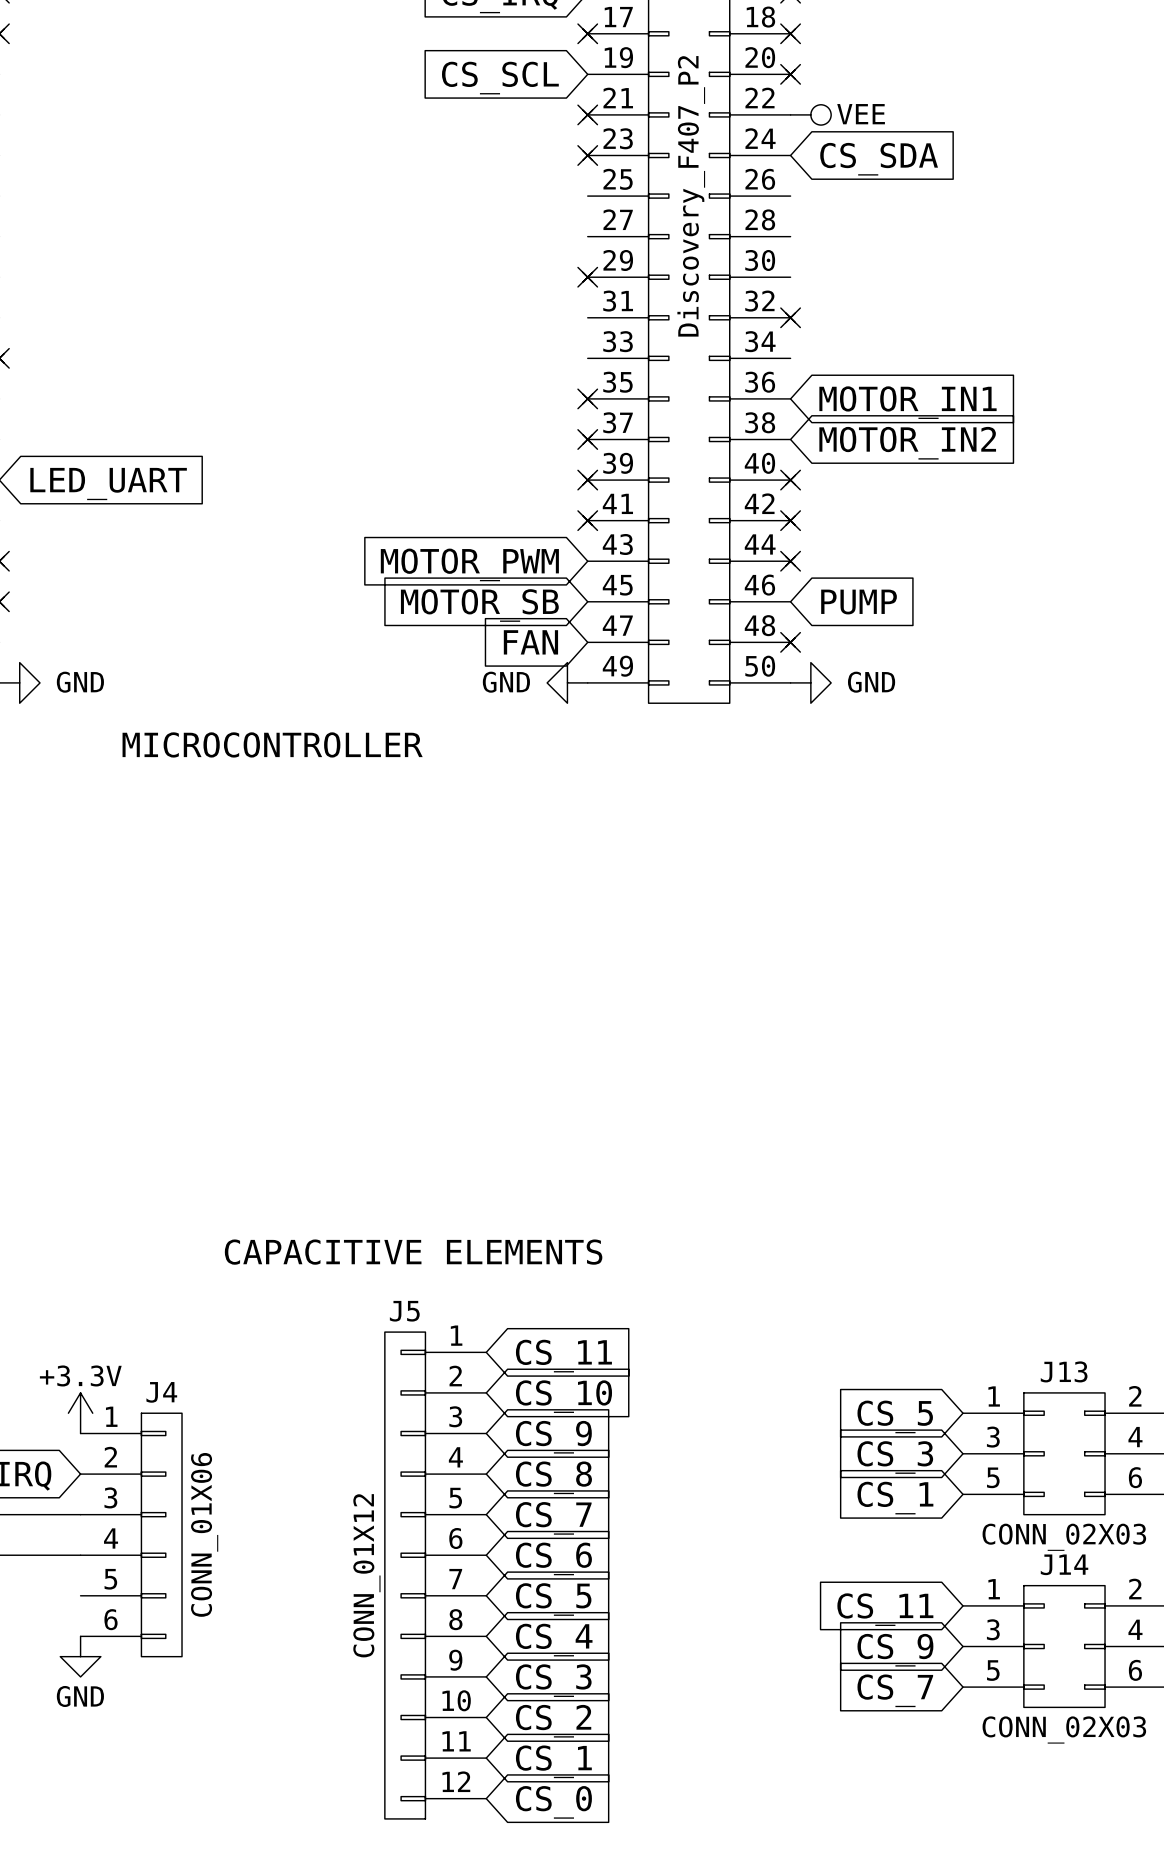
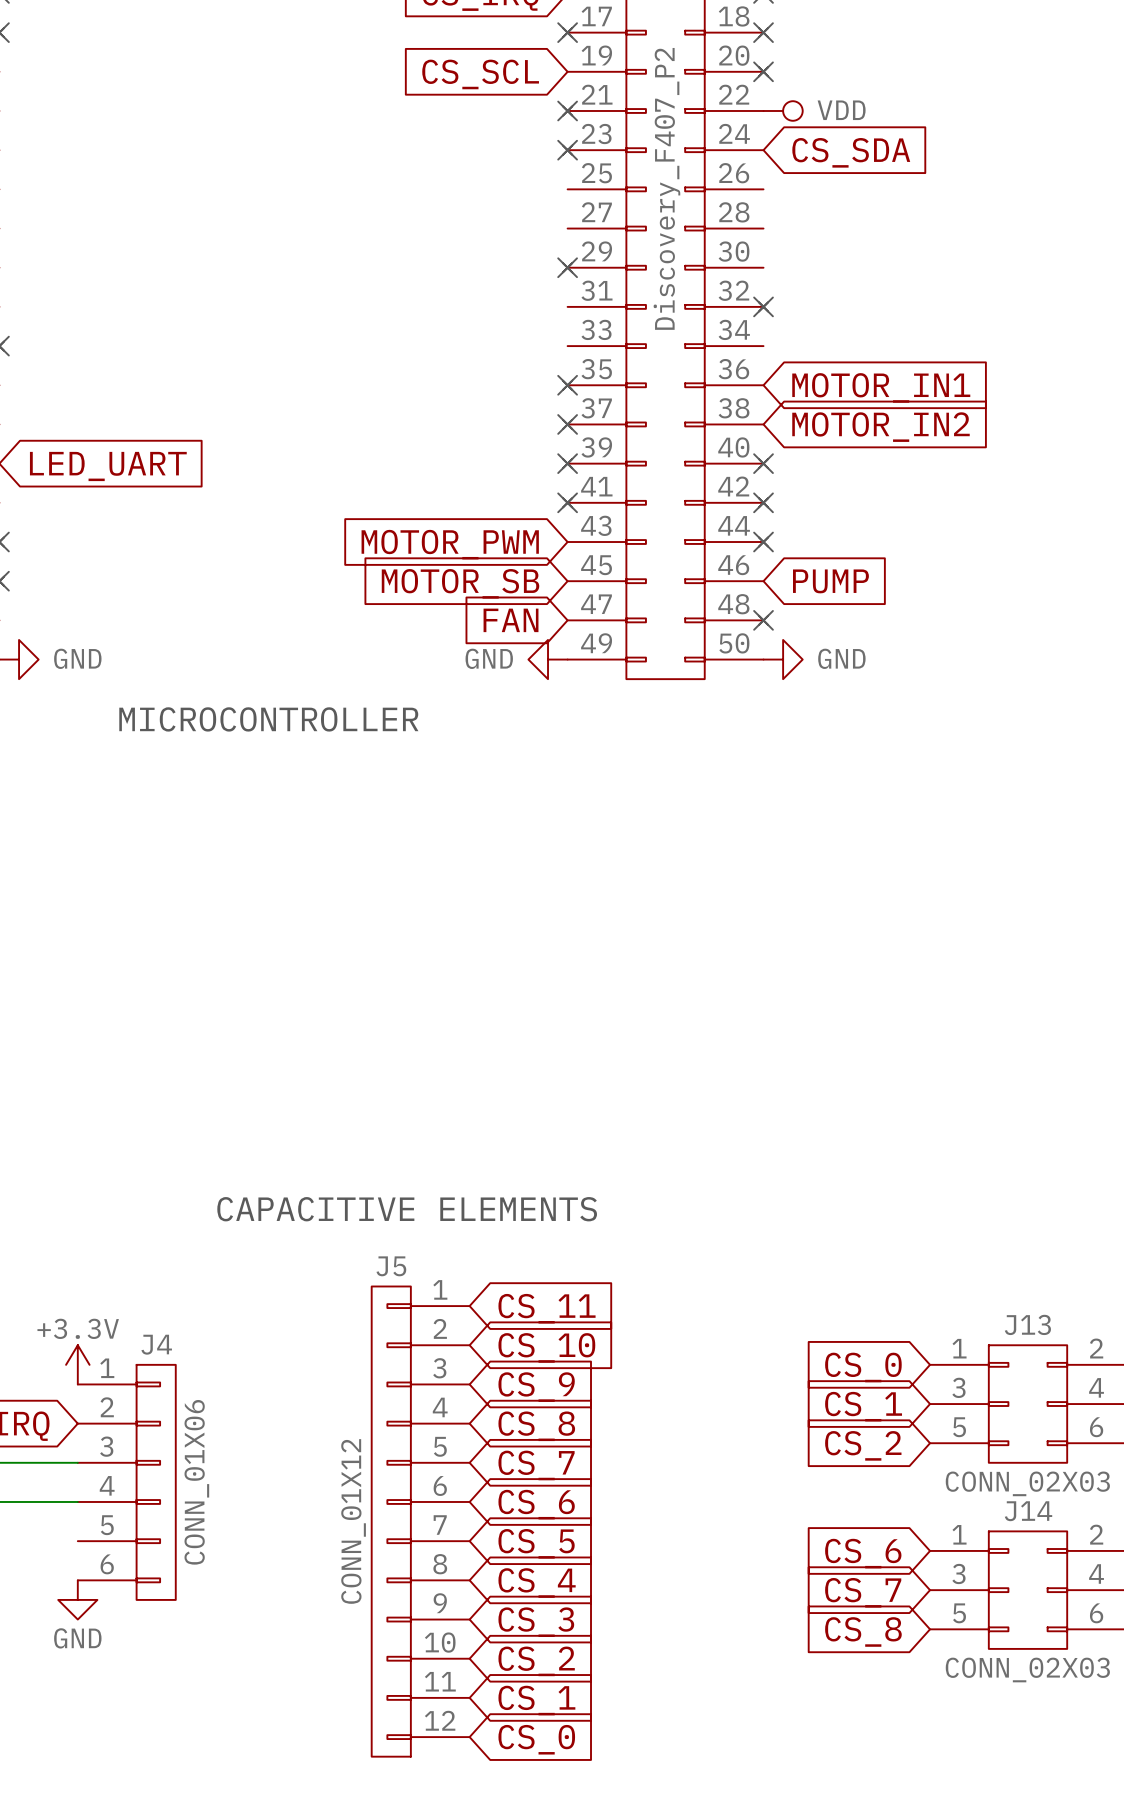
power symbol: VEE (810, 114) -> VDD (783, 110)
global label: CS_5 (895, 1416) -> CS_0 (863, 1367)
global label: CS_3 (895, 1457) -> CS_1 (863, 1406)
global label: CS_1 (895, 1498) -> CS_2 (863, 1445)
global label: CS_11 (885, 1609) -> CS_6 (863, 1553)
global label: CS_9 (895, 1650) -> CS_7 (863, 1592)
global label: CS_7 (895, 1690) -> CS_8 (863, 1631)

